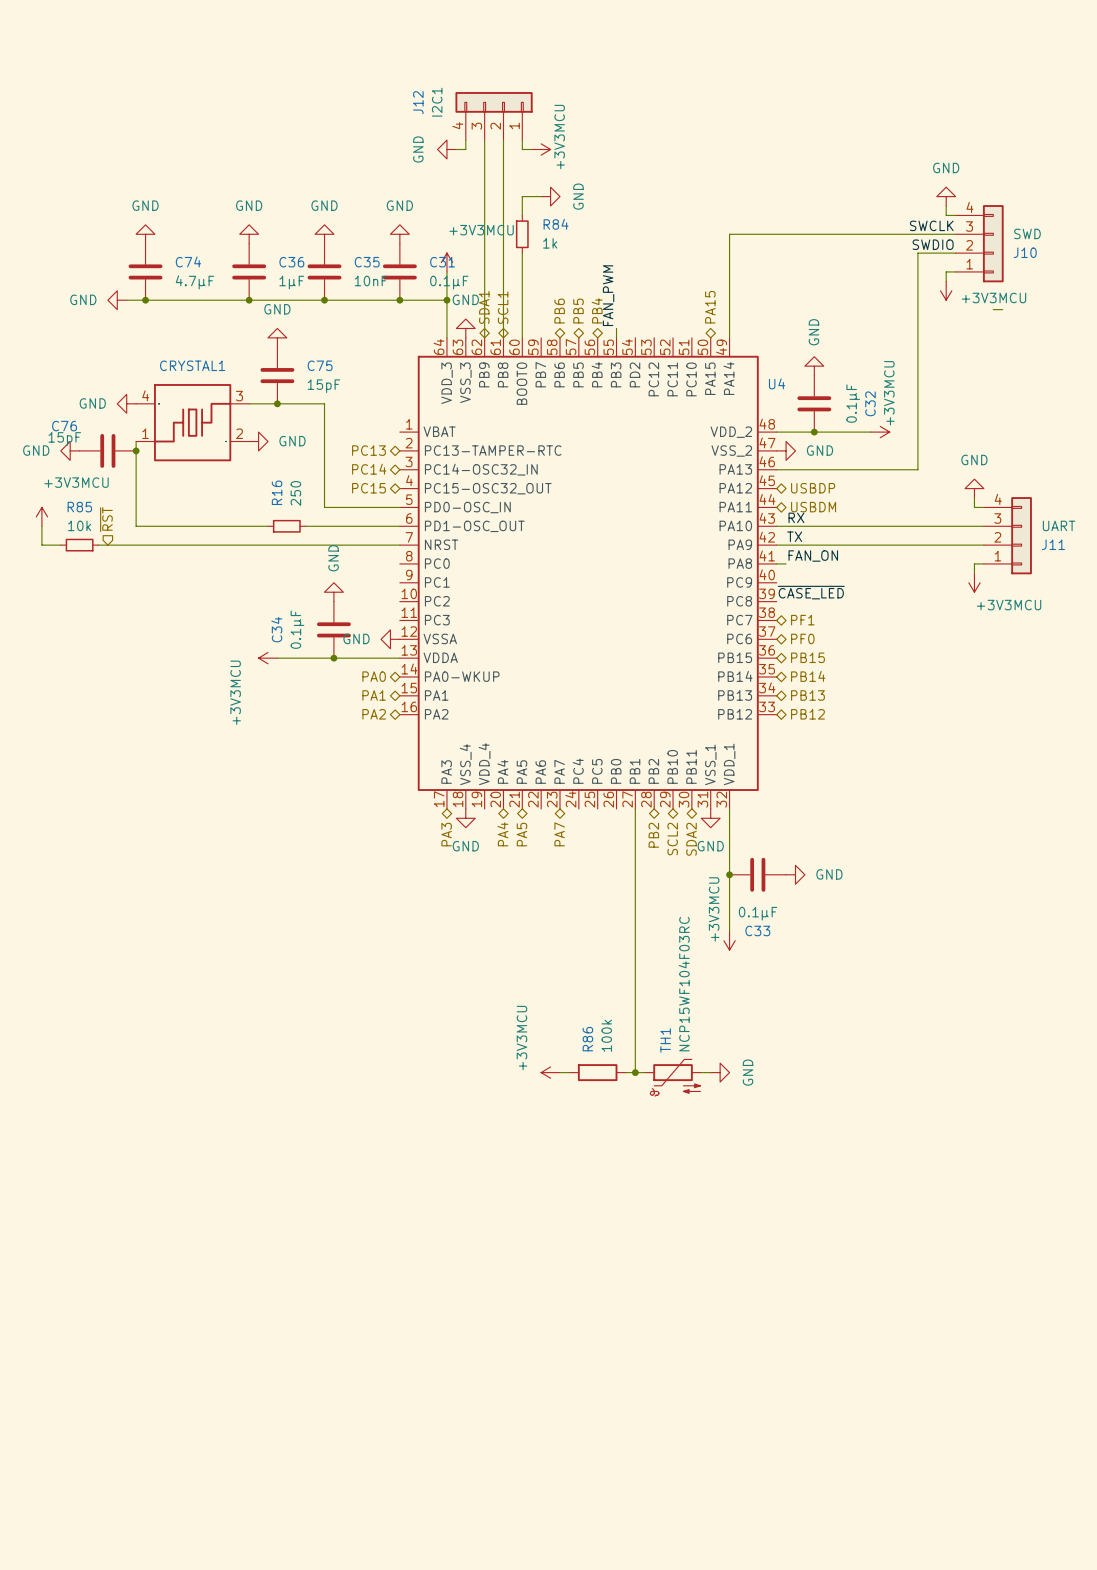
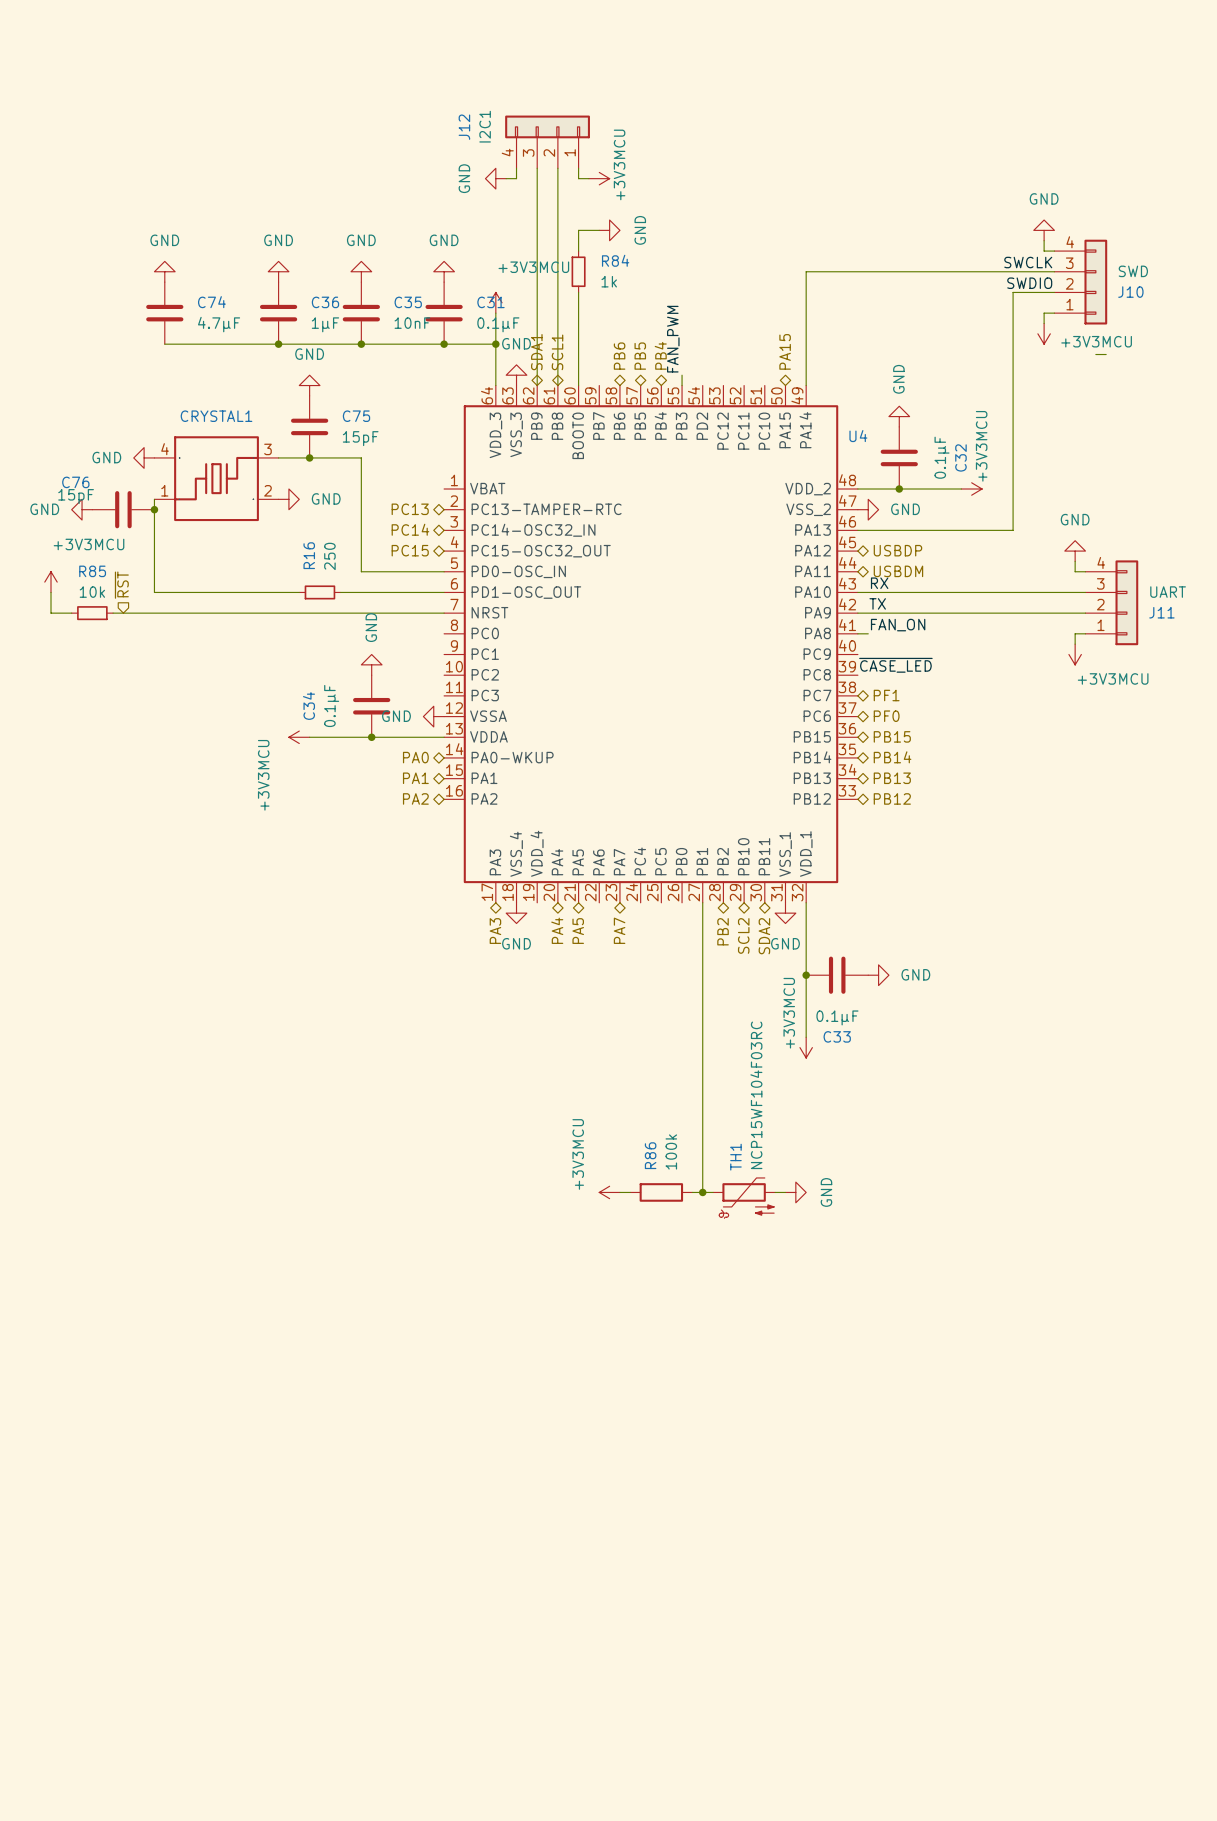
power symbol: GND (117, 300) -> none
wire: (126, 300) (145, 300) -> none
junction: (145, 300) -> none

